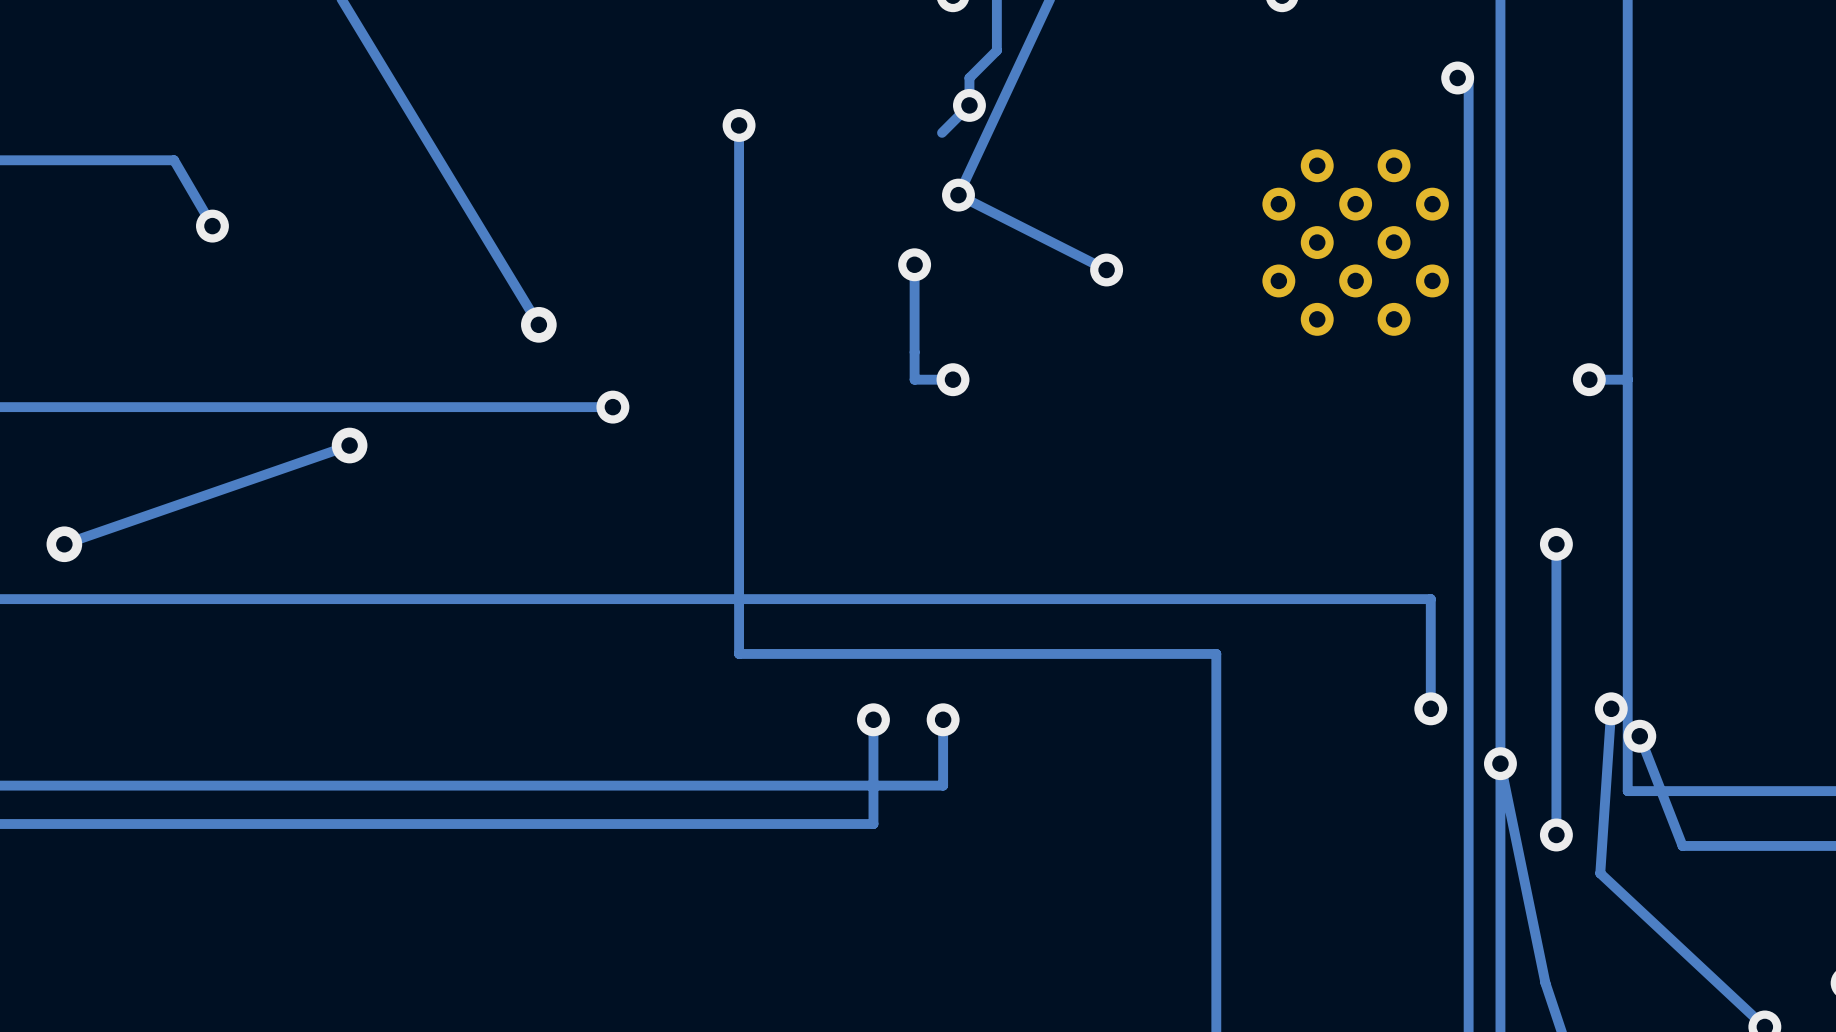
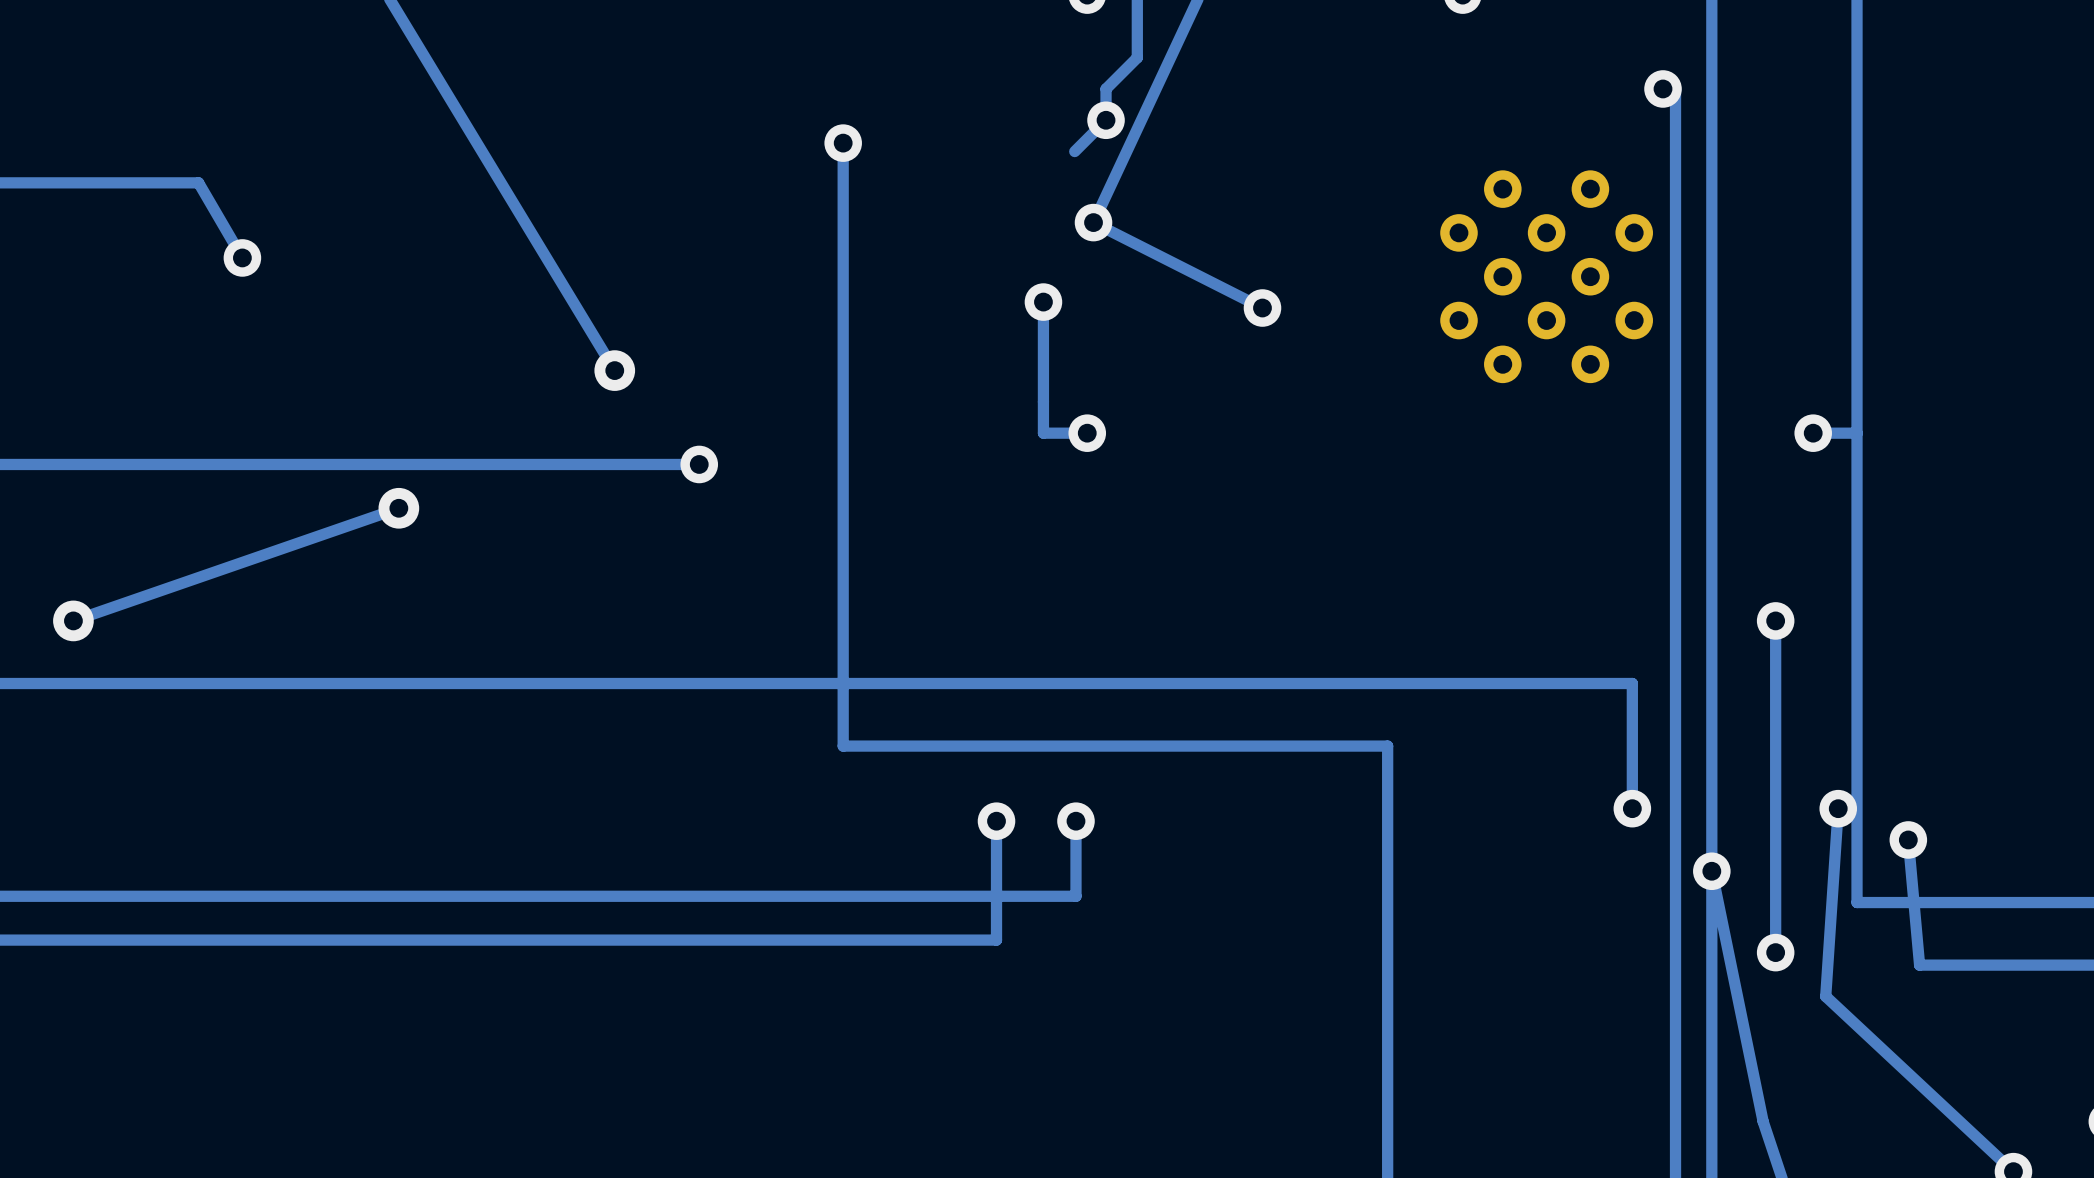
track: (1639, 736) (1682, 845) -> (1908, 839) (1919, 965)
via position: (1639, 736) -> (1908, 839)

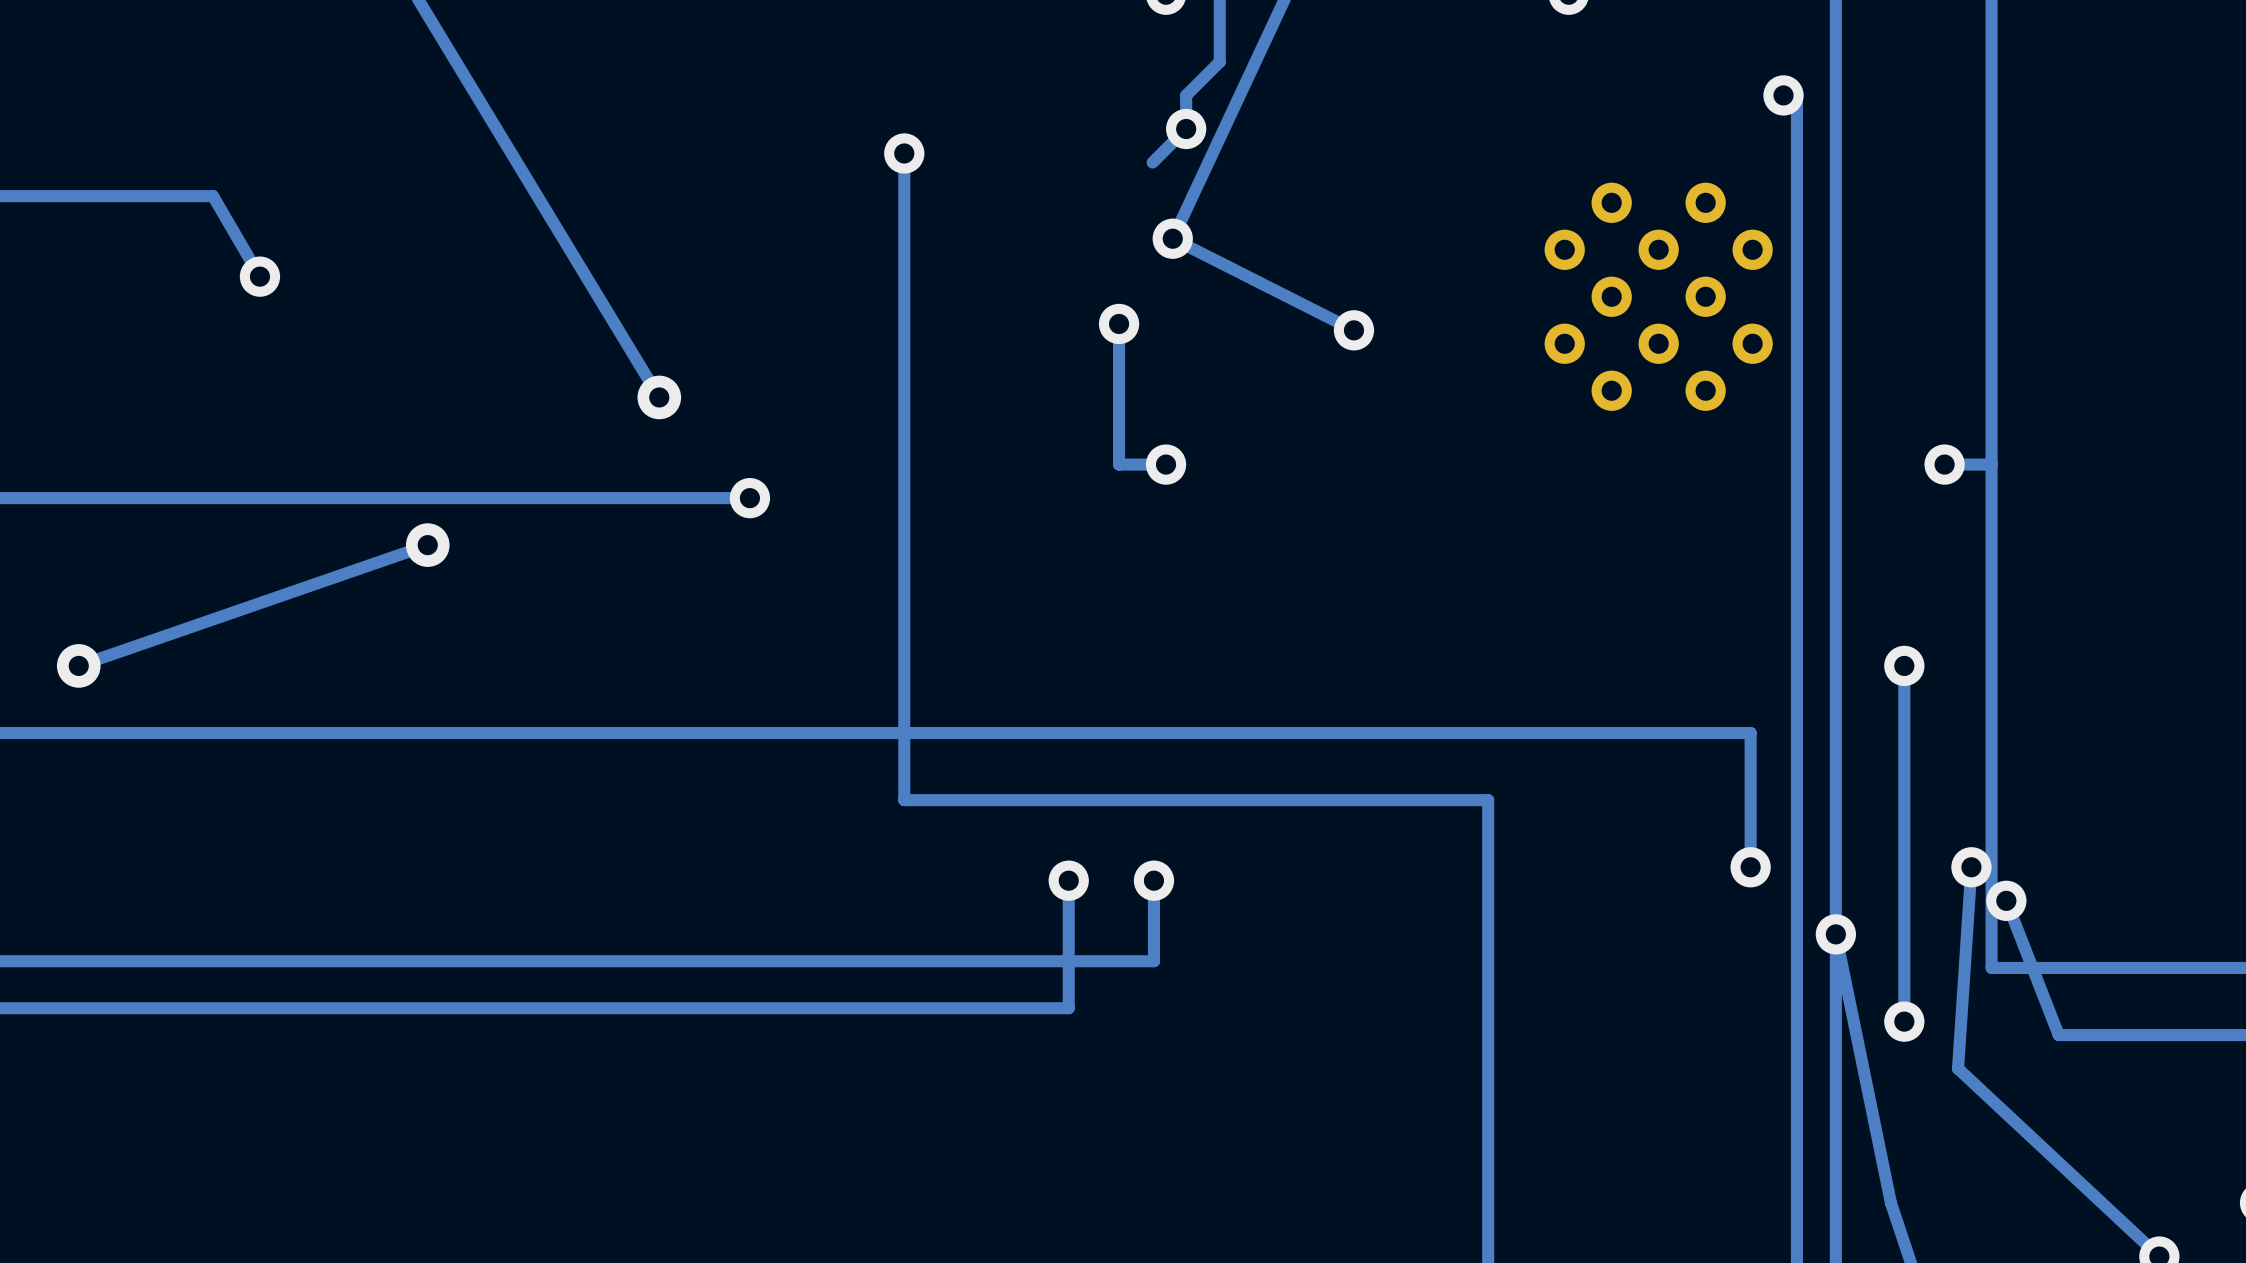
track: (1908, 839) (1919, 965) -> (2006, 900) (2058, 1035)
via position: (1908, 839) -> (2006, 900)

